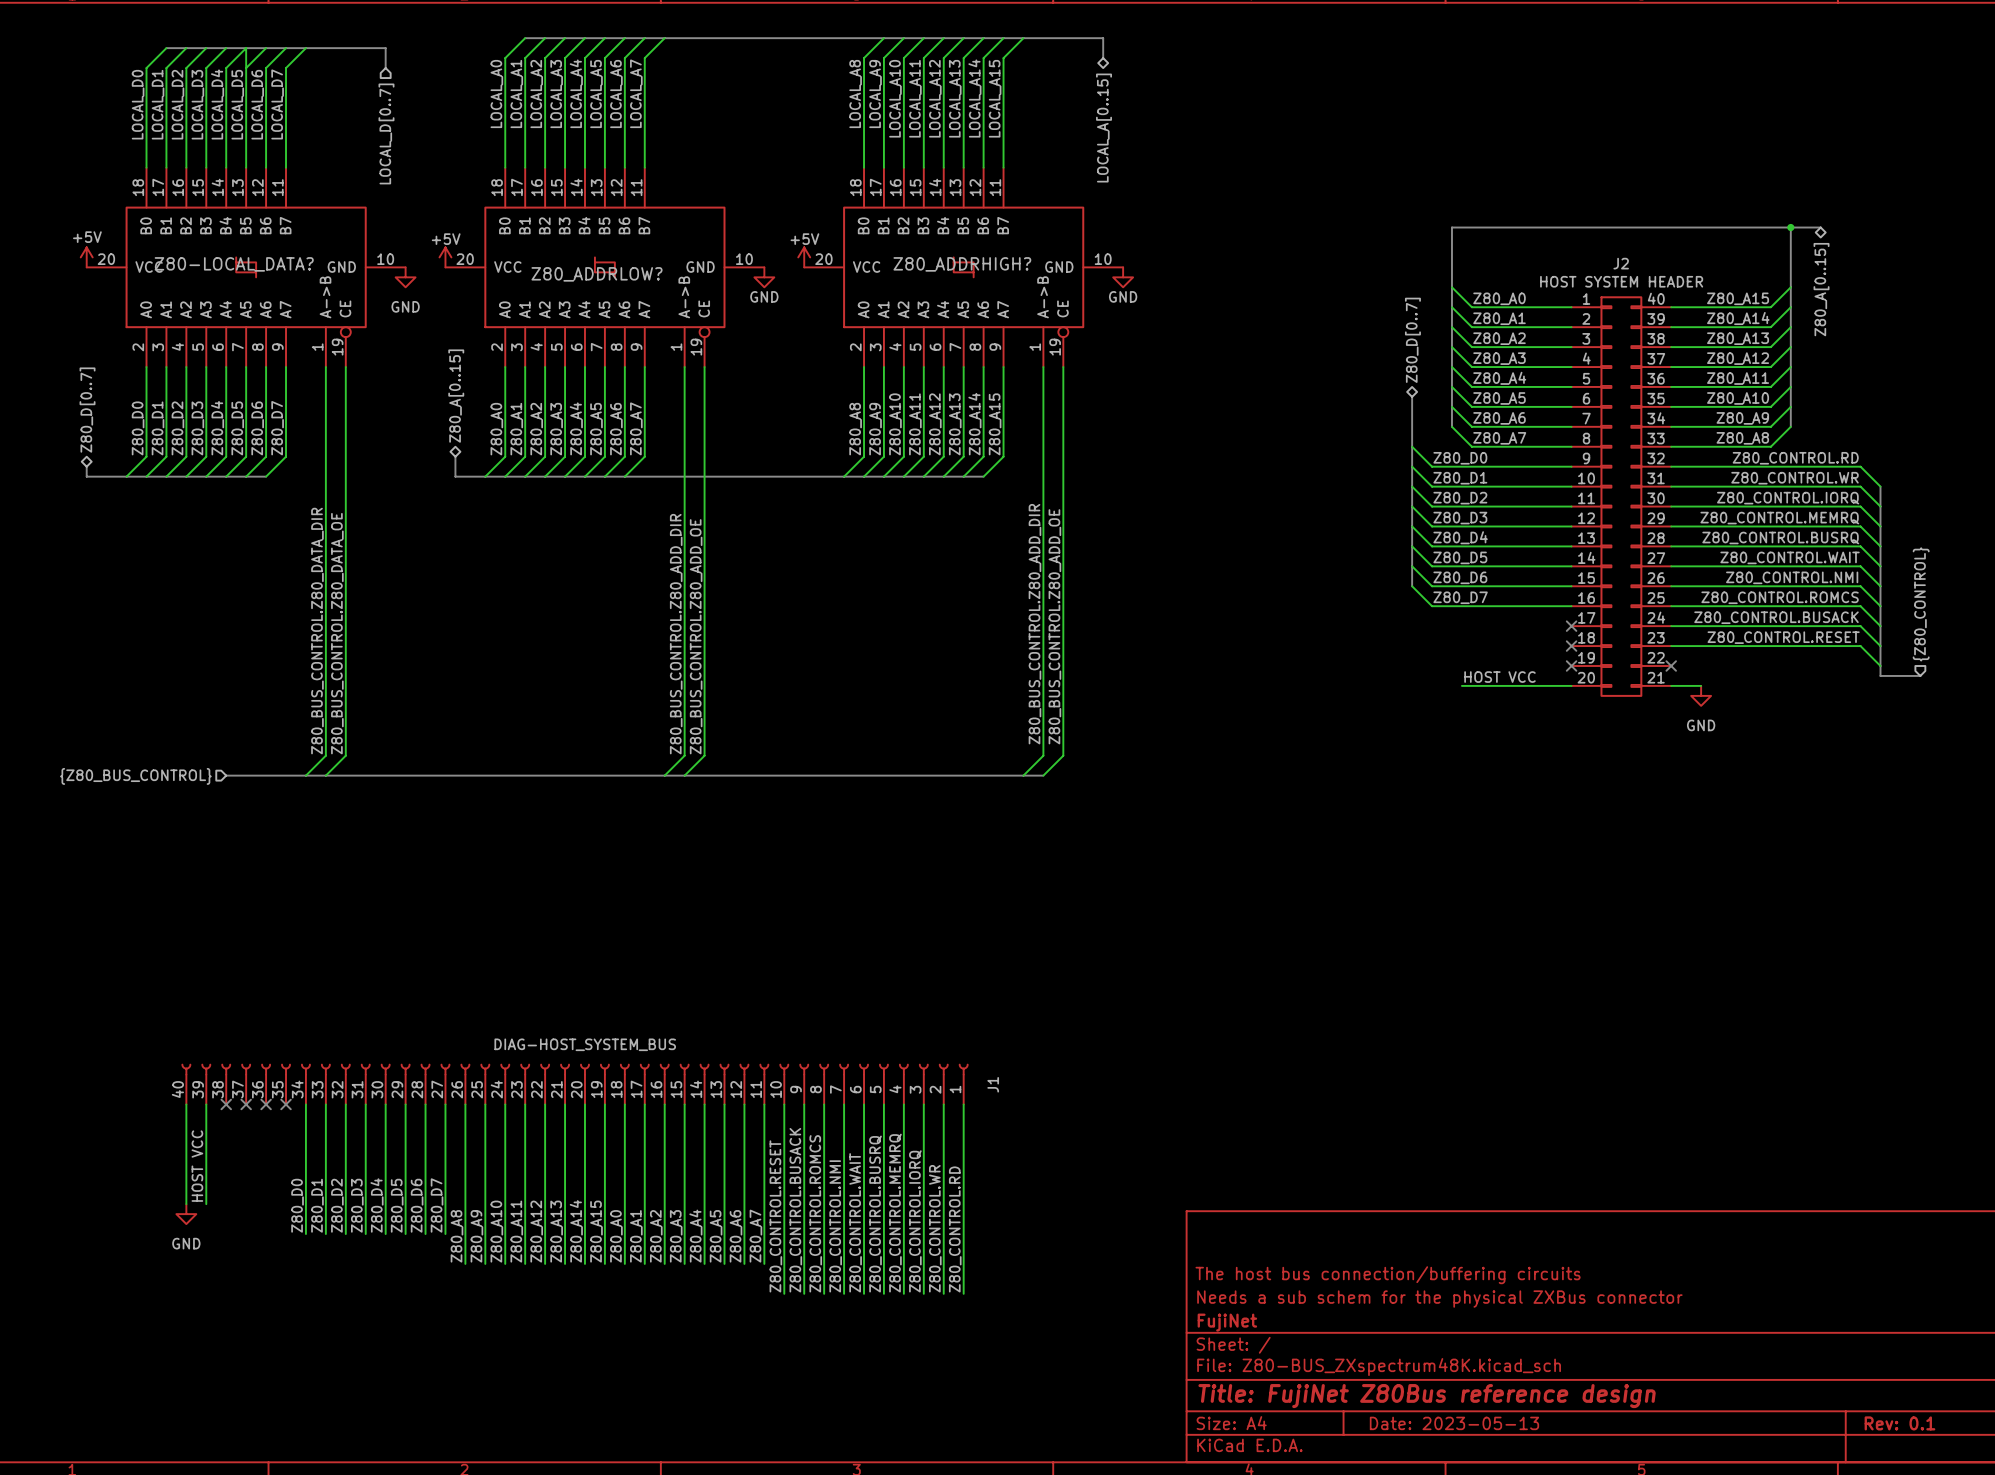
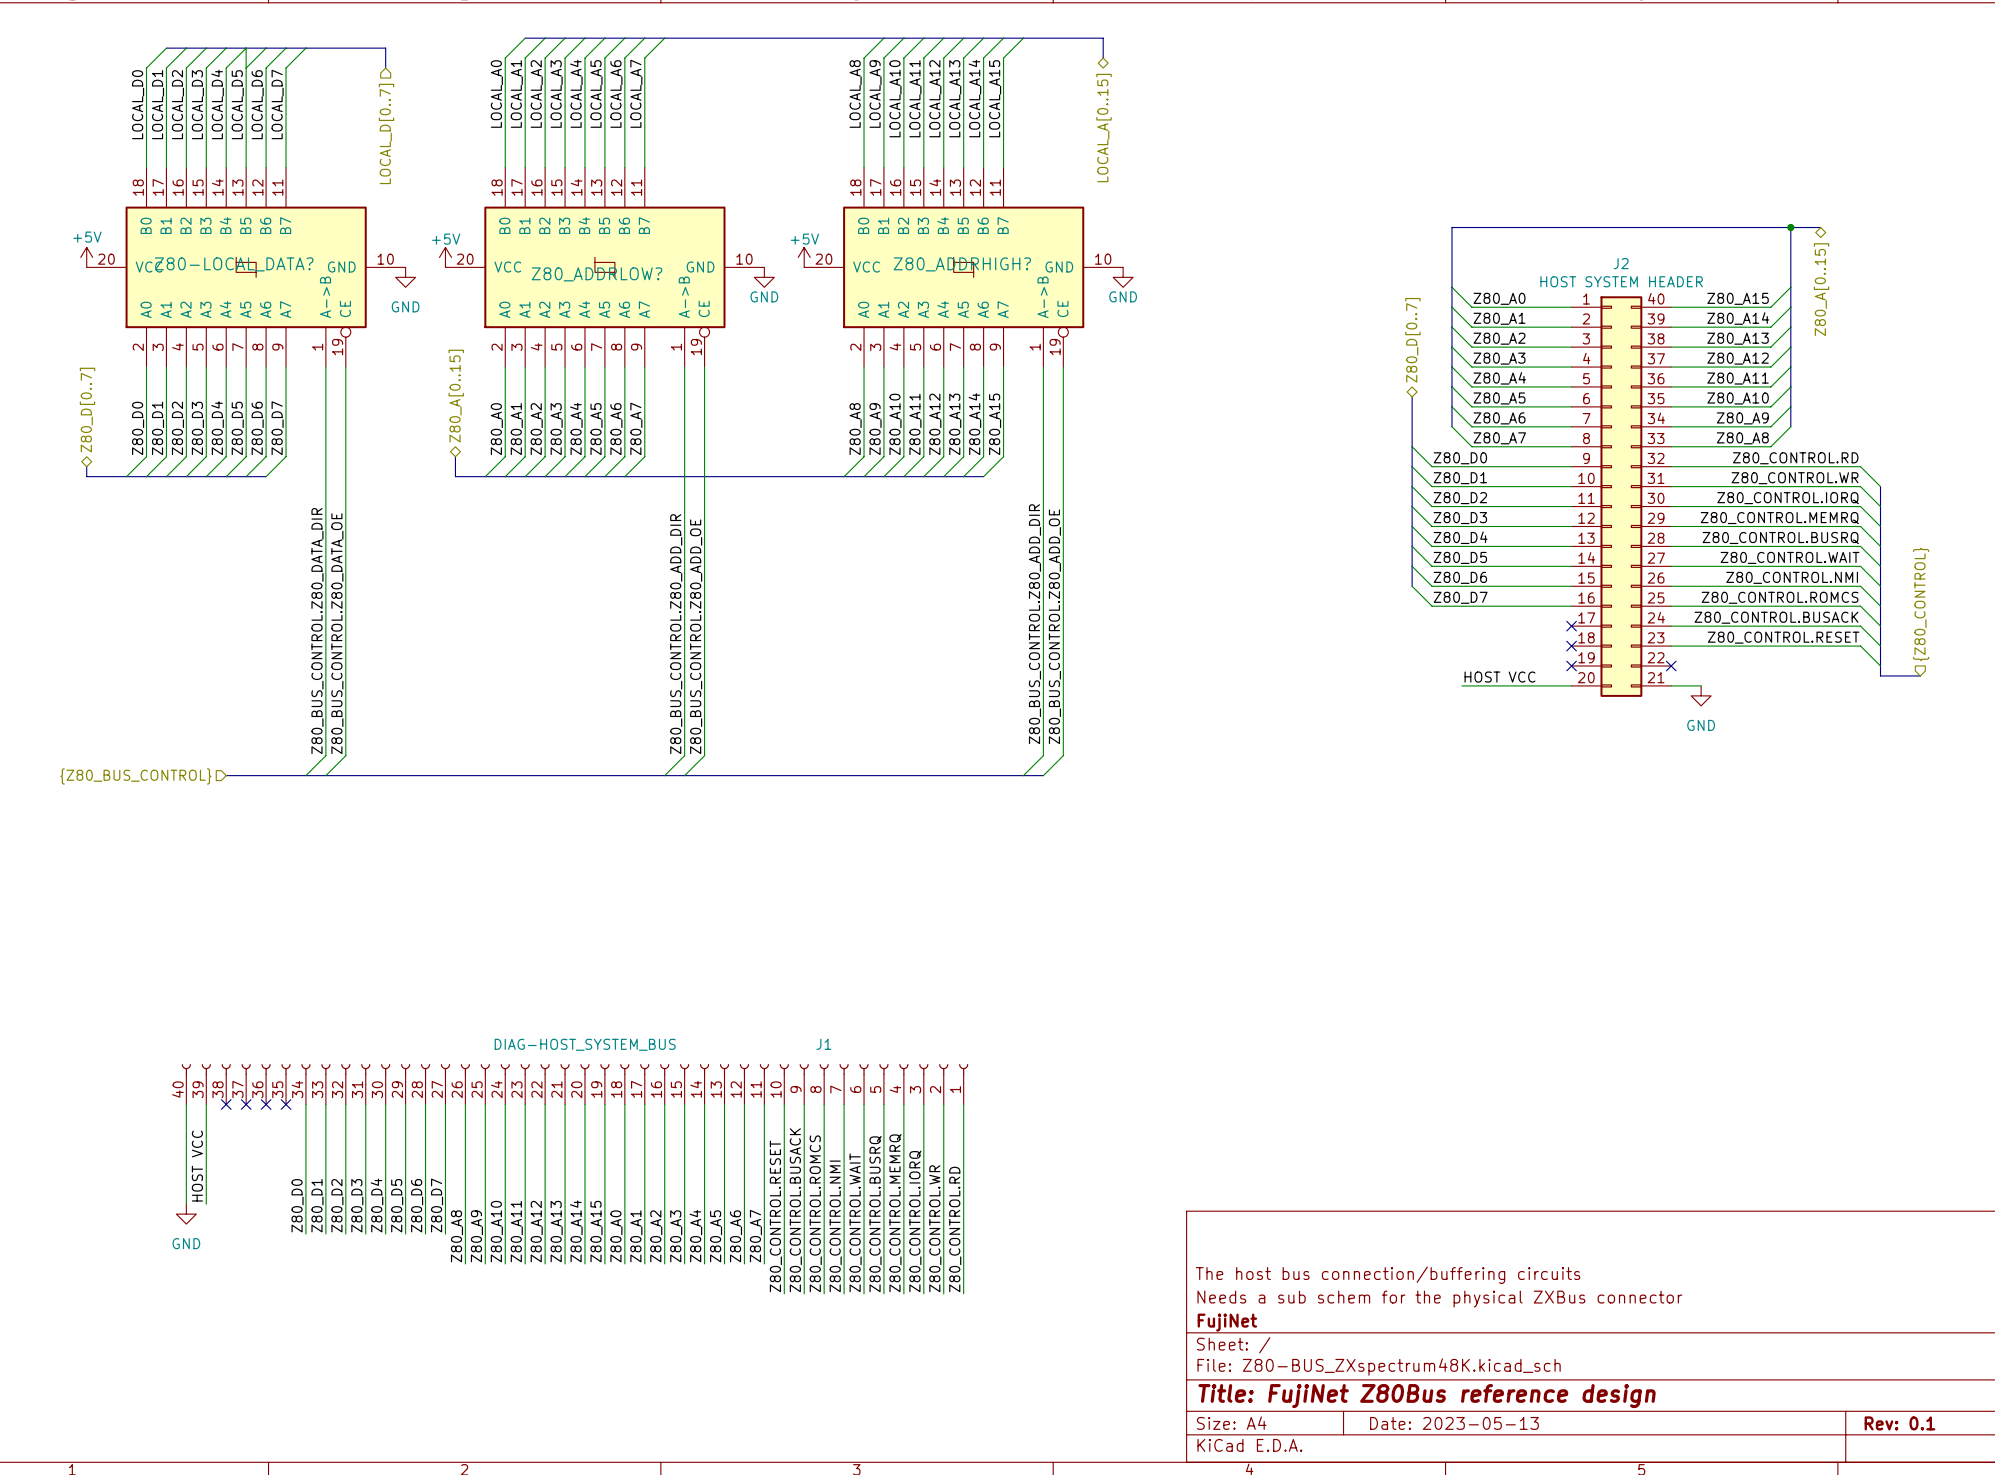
J1 name rotation: 0° (993, 1084) -> 90° clockwise (823, 1044)
J1 name position: J1 (993, 1084) -> J1 (823, 1044)

